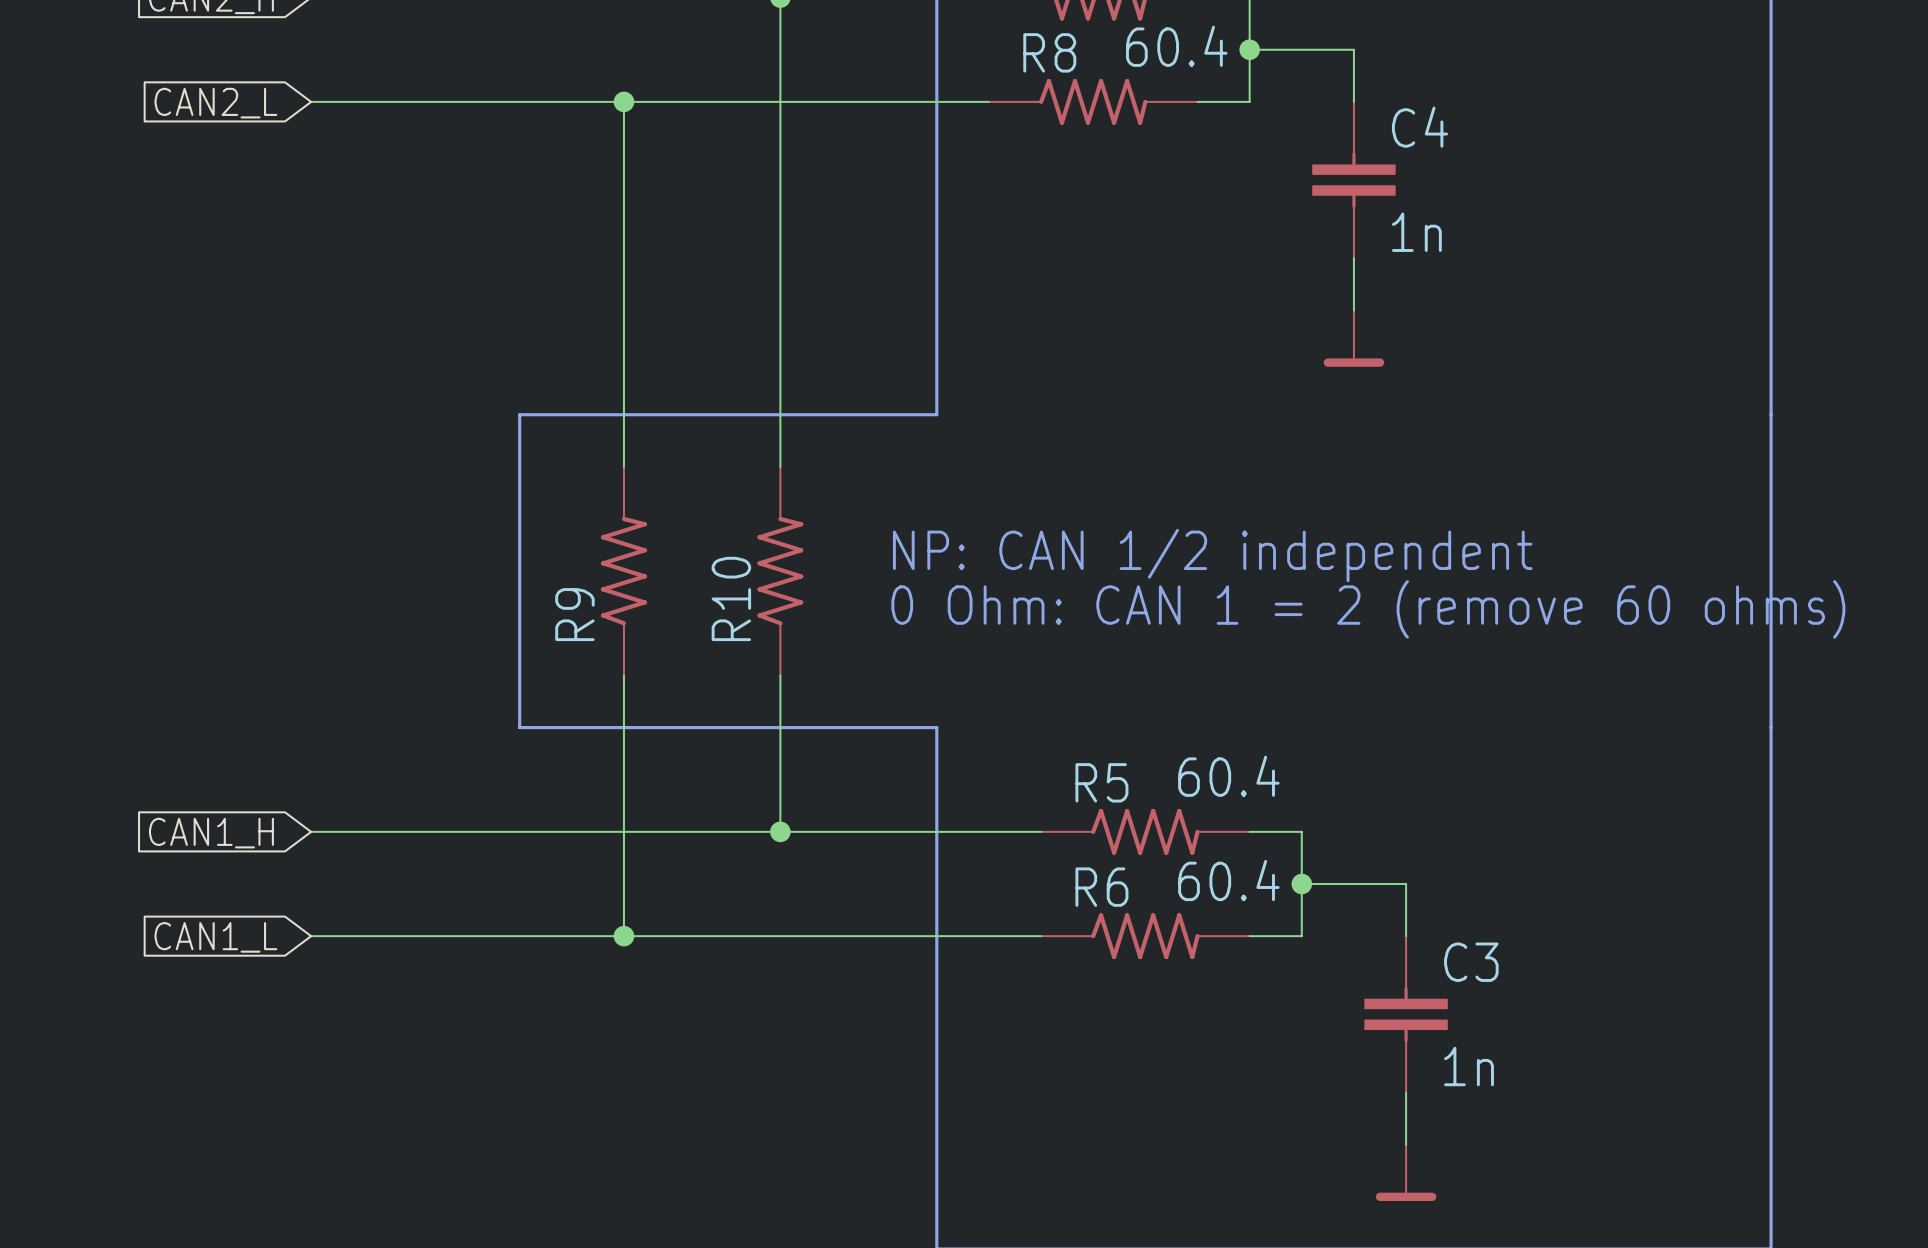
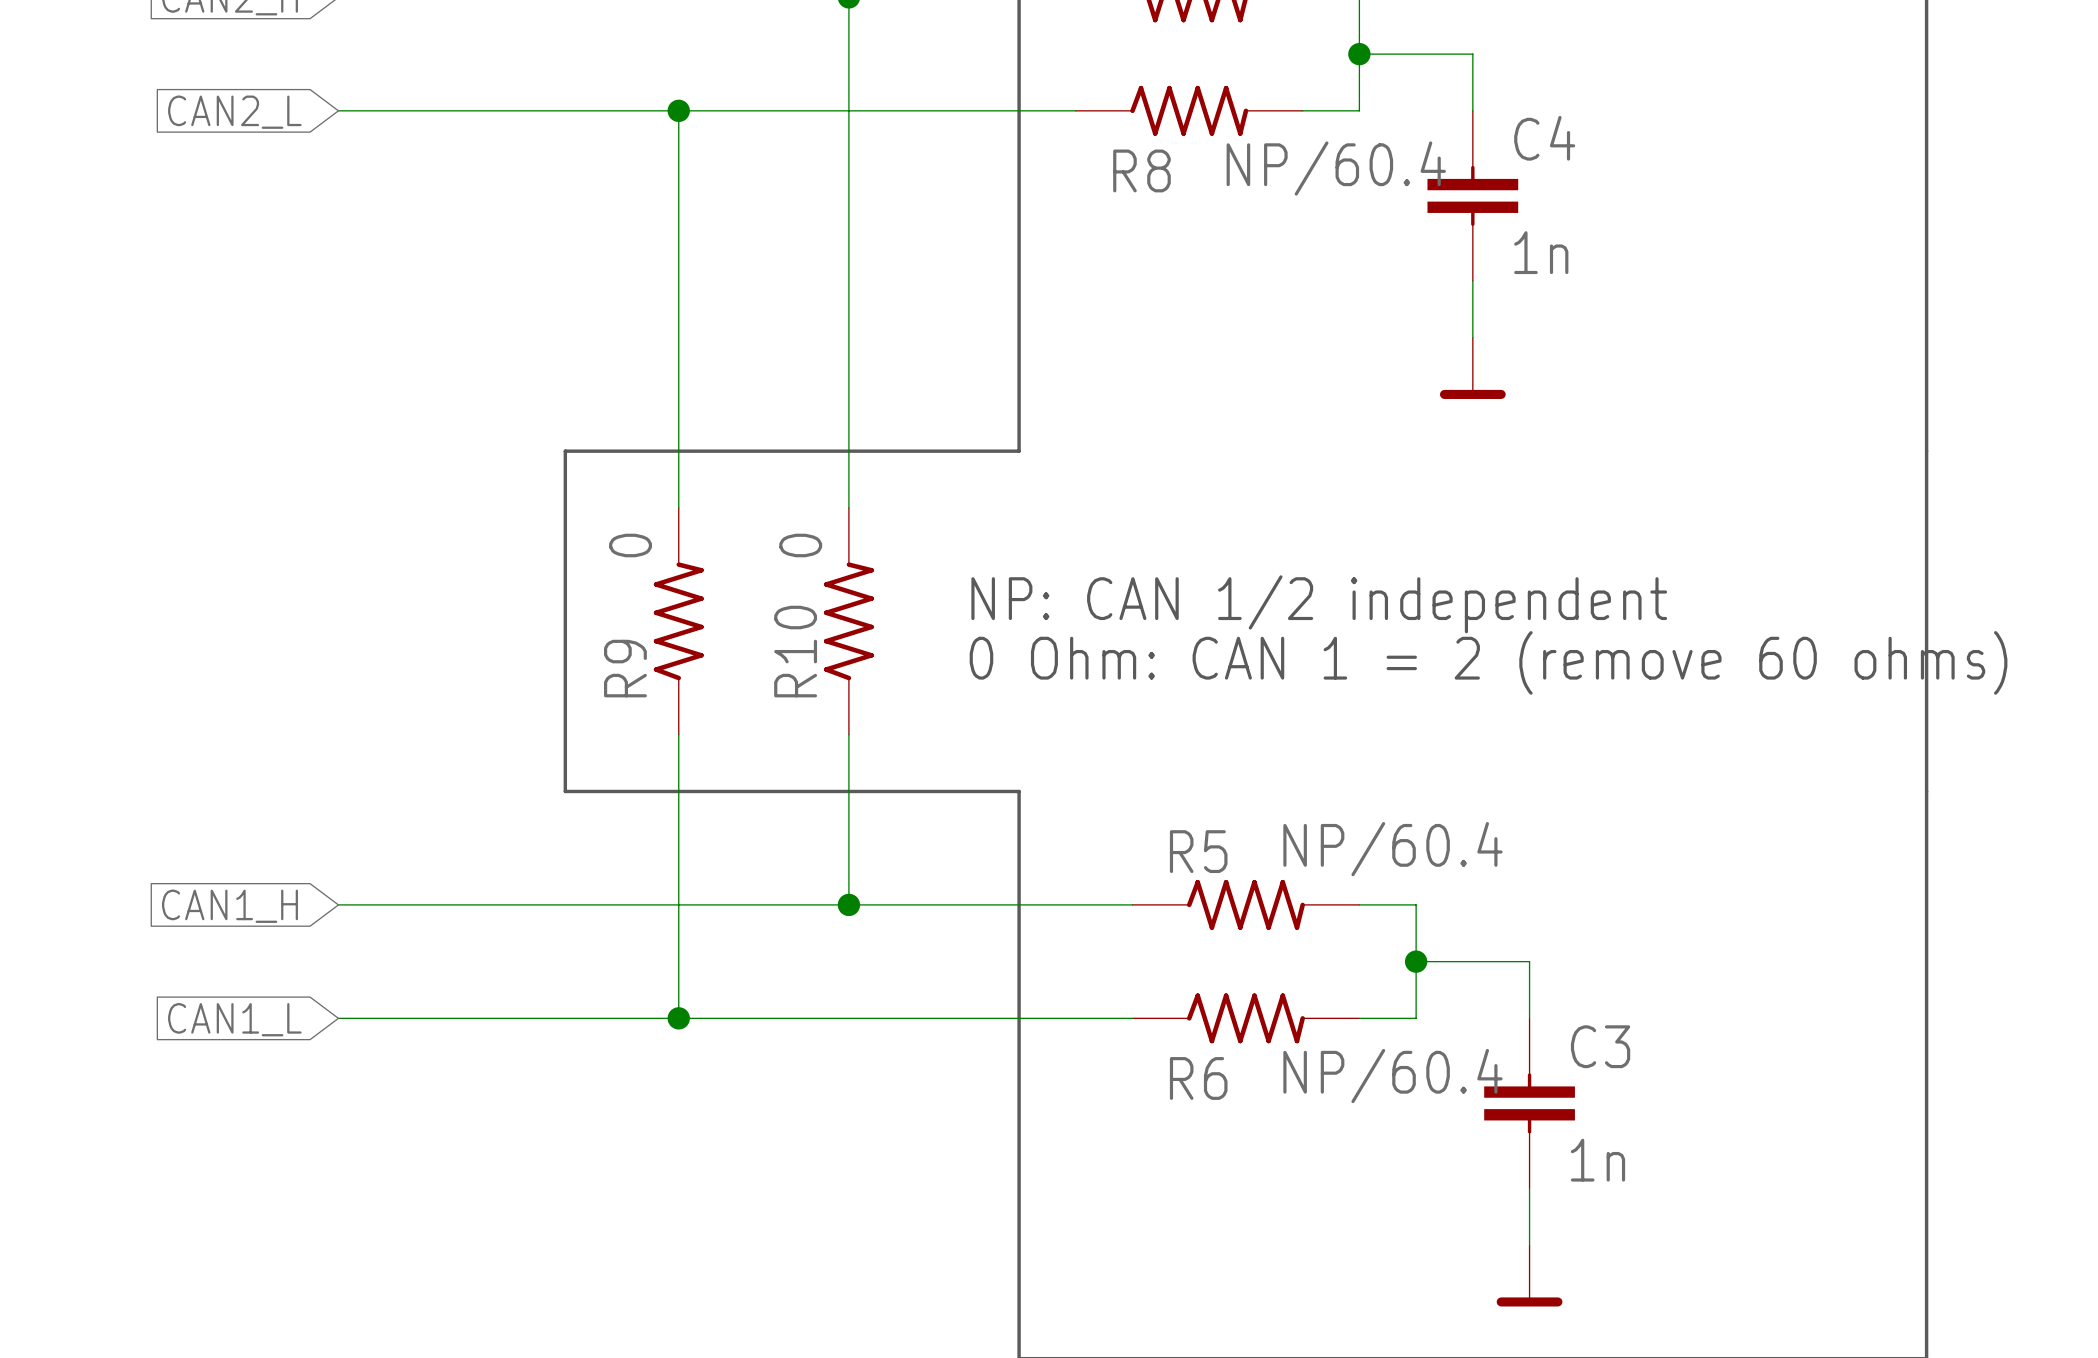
R8 value: 60.4 (1176, 46) -> NP/60.4 (1336, 168)
R8 name position: R8 (1049, 52) -> R8 (1141, 170)
R9 value: none -> 0 (630, 545)
R10 value: none -> 0 (800, 545)
R5 value: 60.4 (1228, 776) -> NP/60.4 (1392, 849)
R6 value: 60.4 (1228, 880) -> NP/60.4 (1392, 1076)
R6 name position: R6 (1101, 887) -> R6 (1198, 1078)

